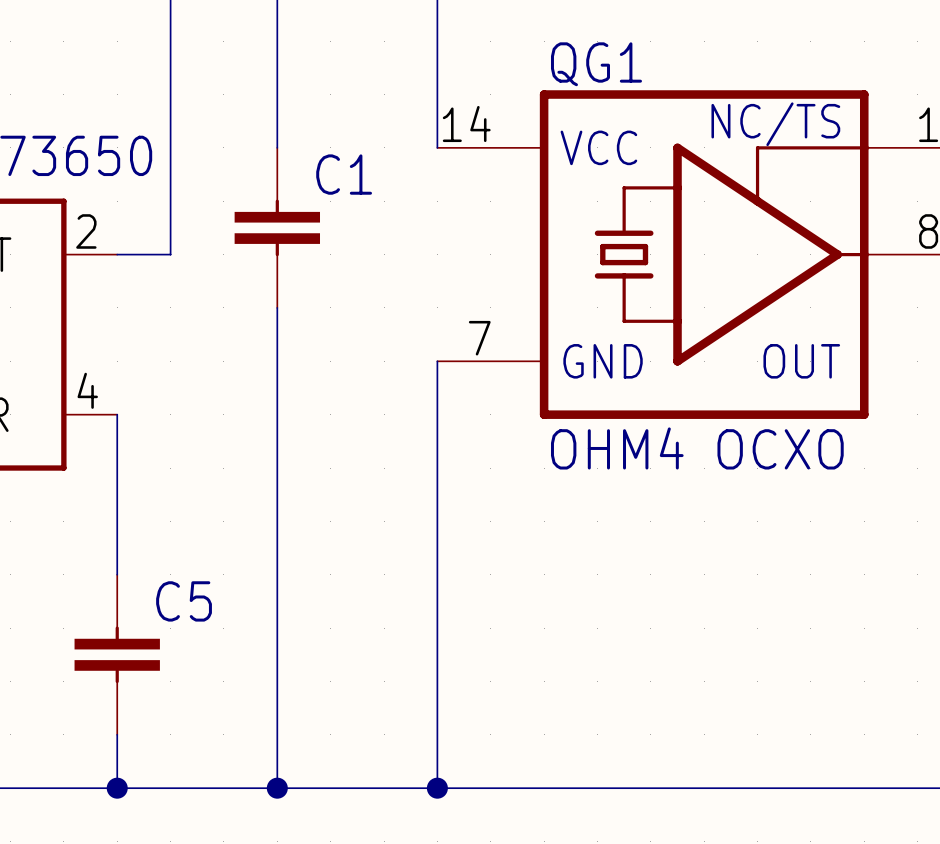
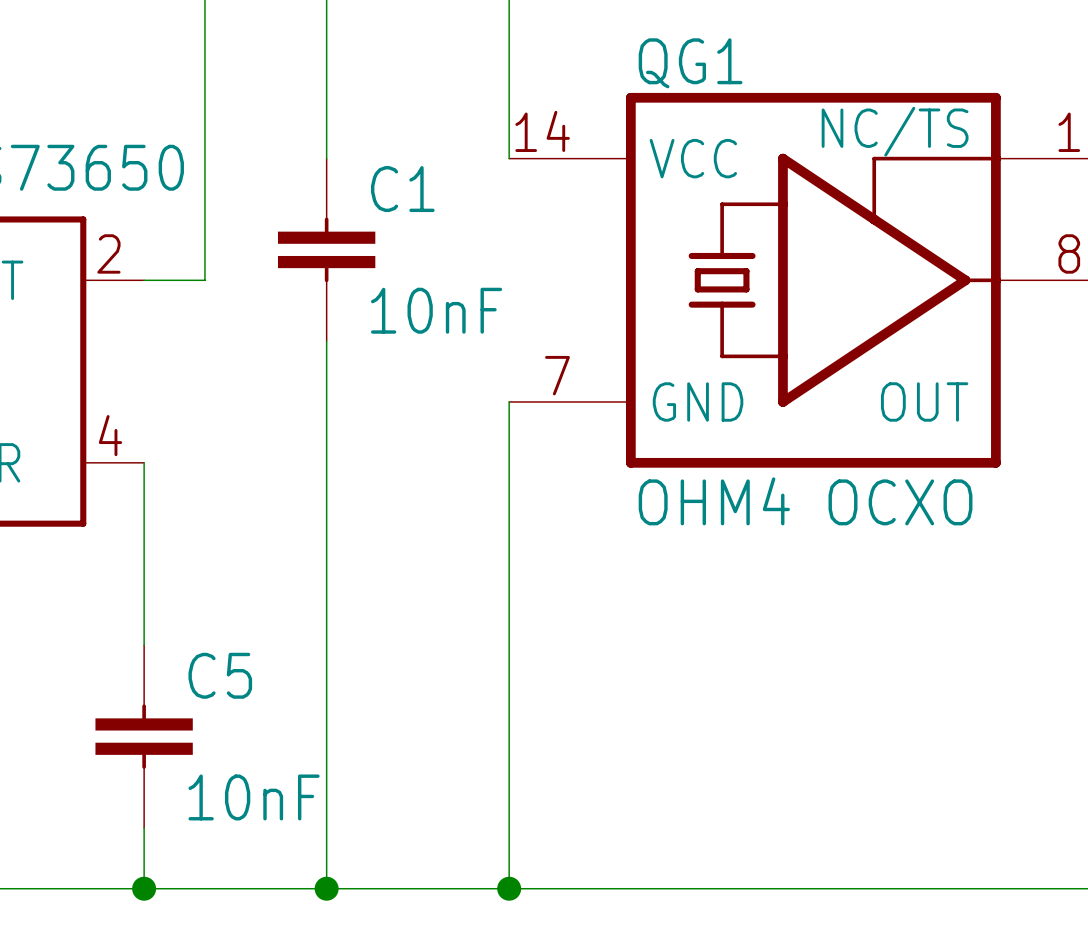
C1 value: none -> 10nF (436, 310)
C5 value: none -> 10nF (254, 797)

